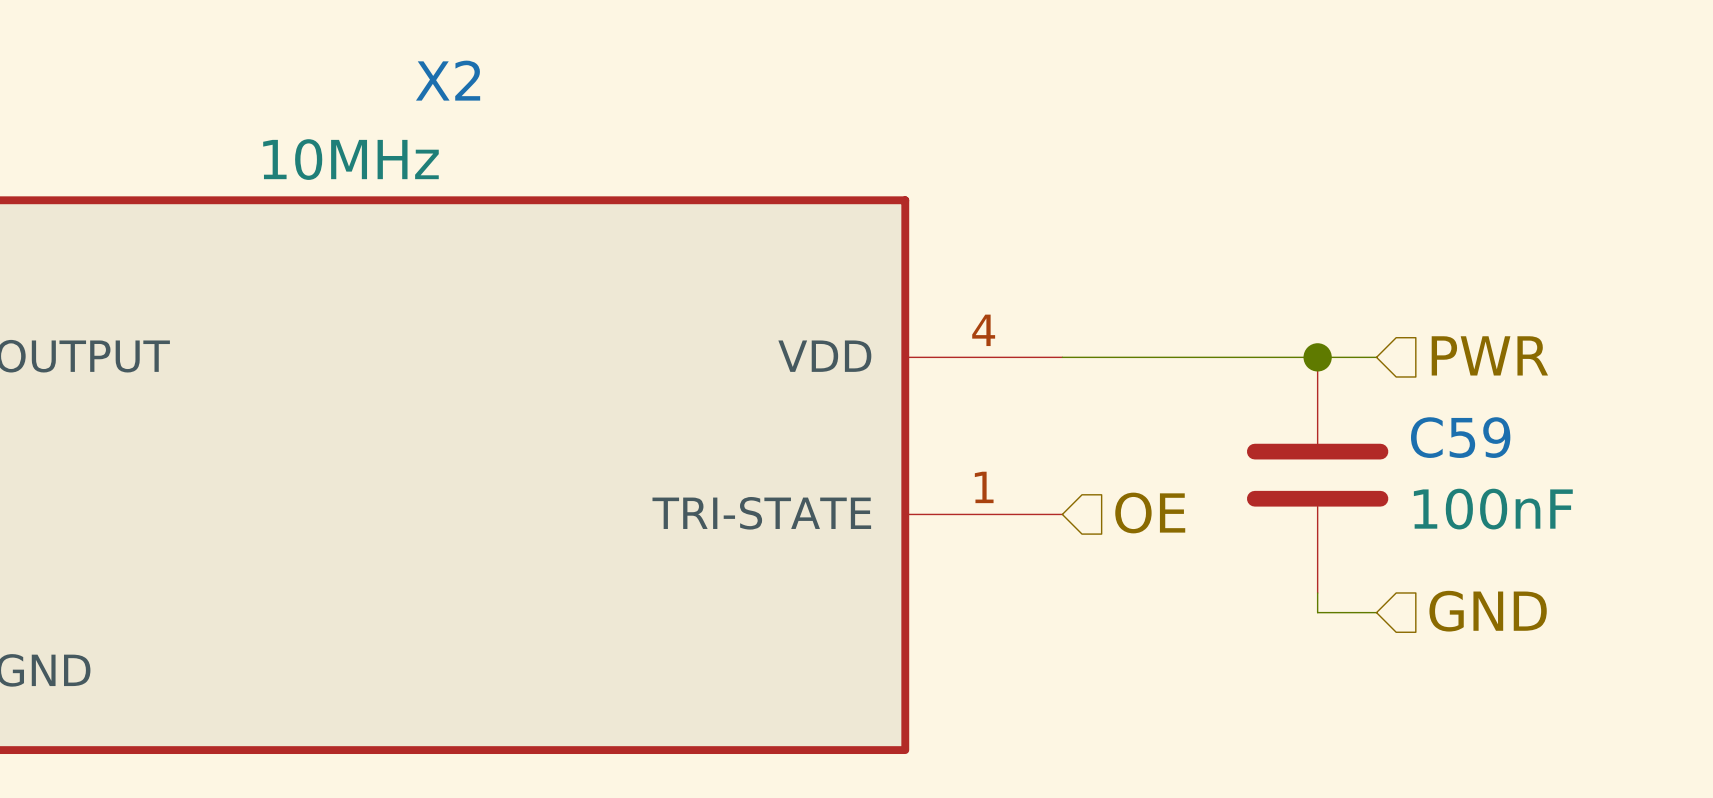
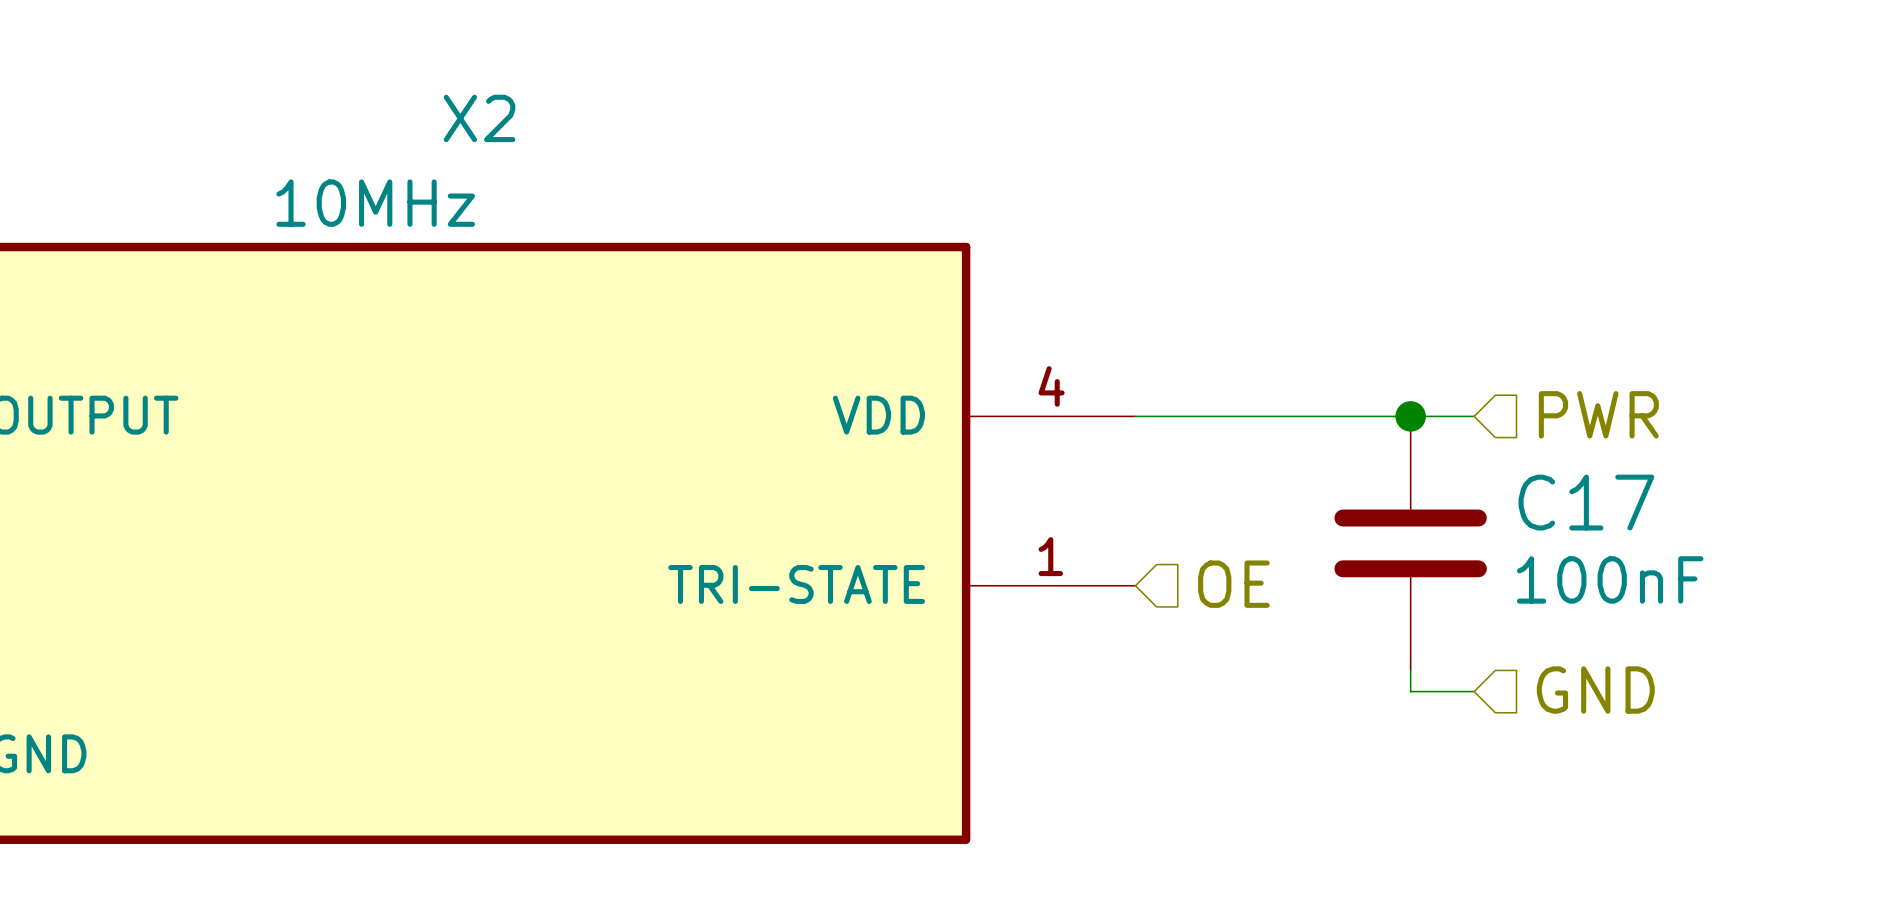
C59 name: C59 (1460, 437) -> C17 (1586, 502)

